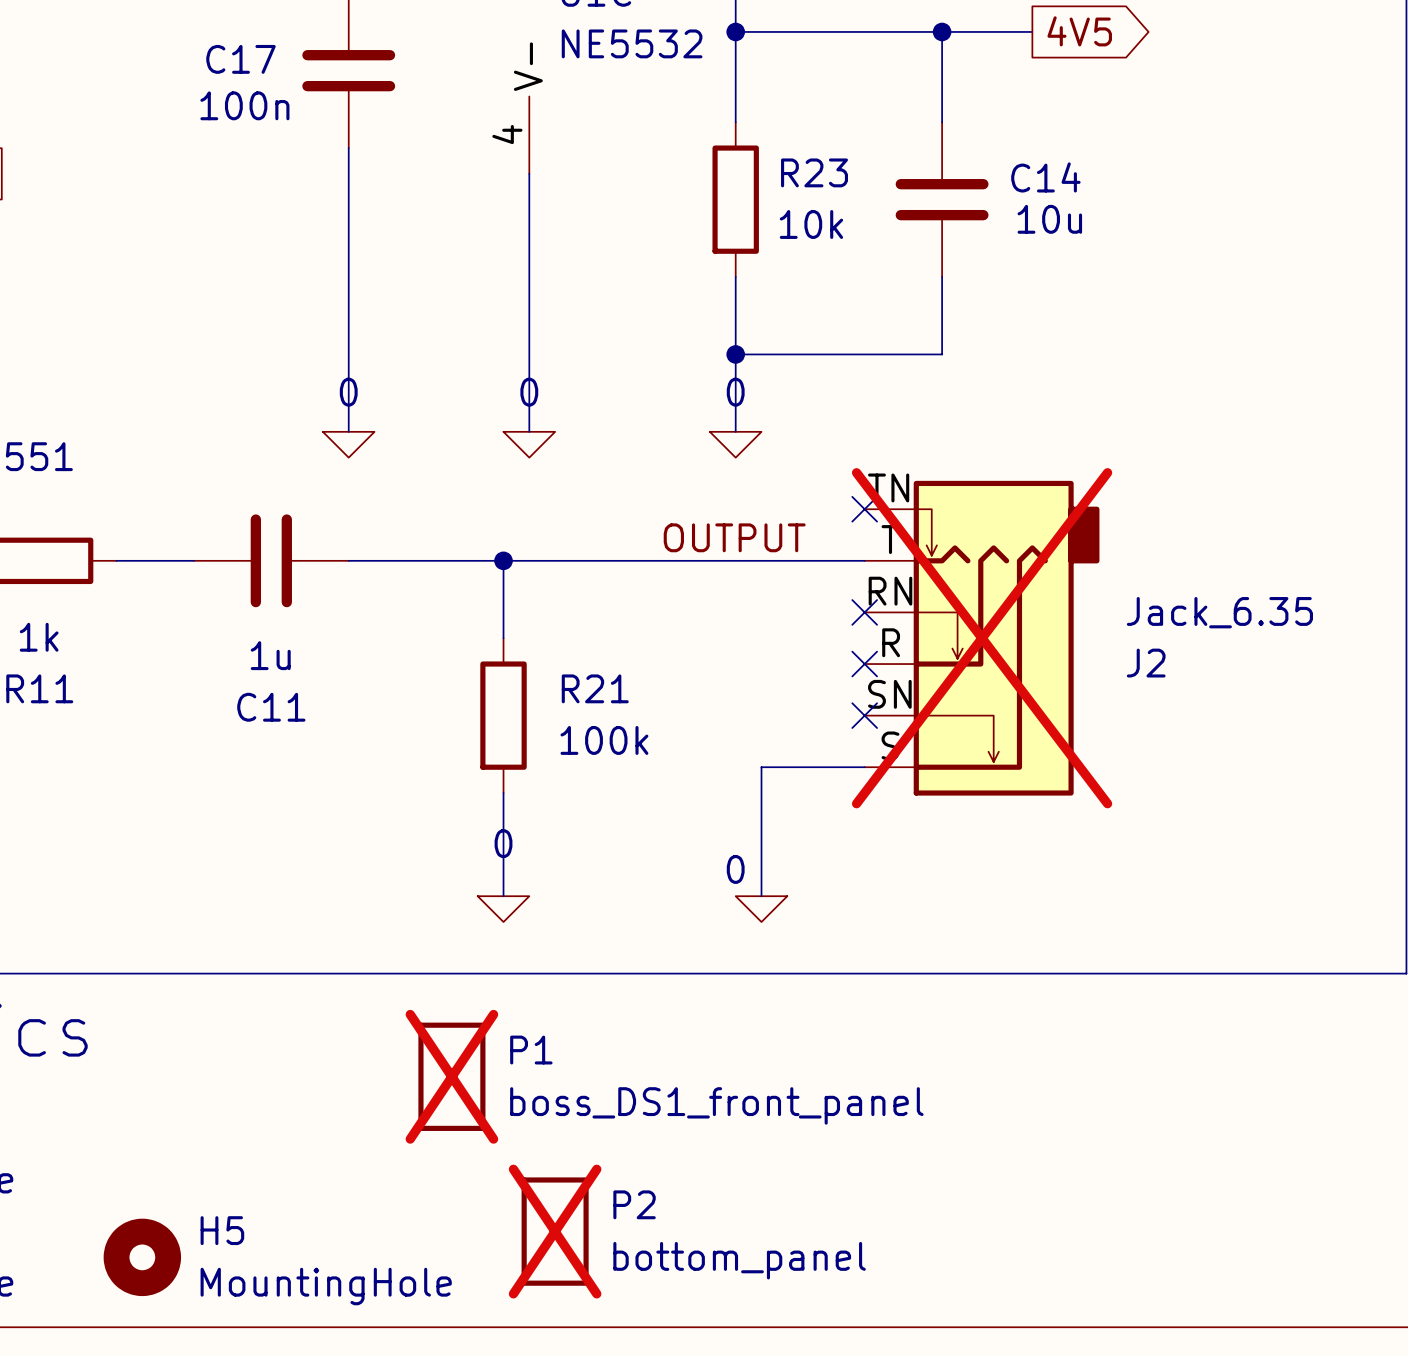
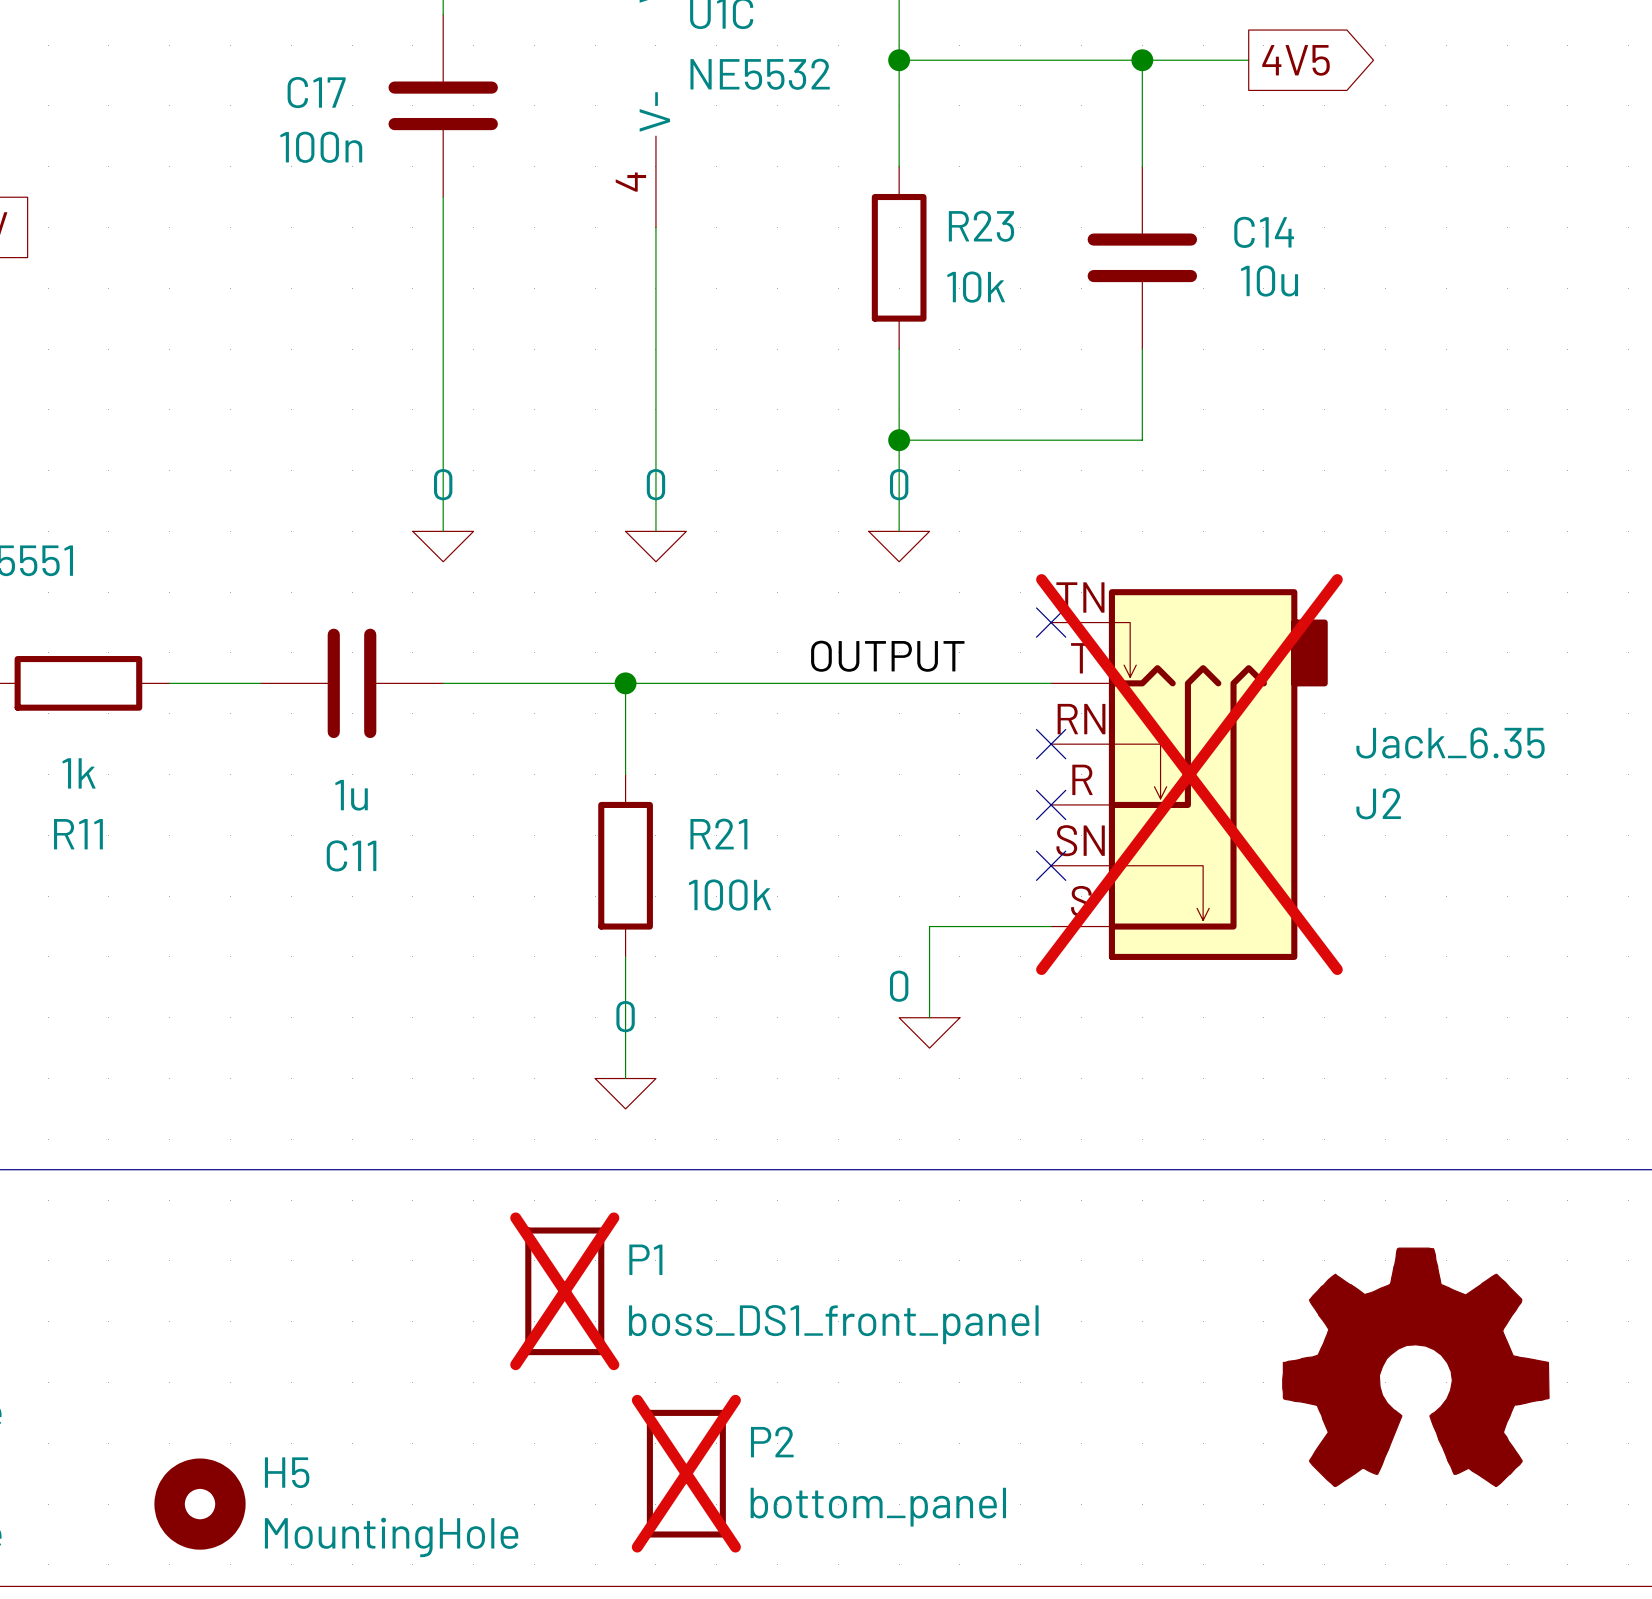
wire: (761, 844) (761, 896) -> none
power symbol position: 0 (761, 909) -> 0 (929, 1032)
part: none -> (1415, 1367)

